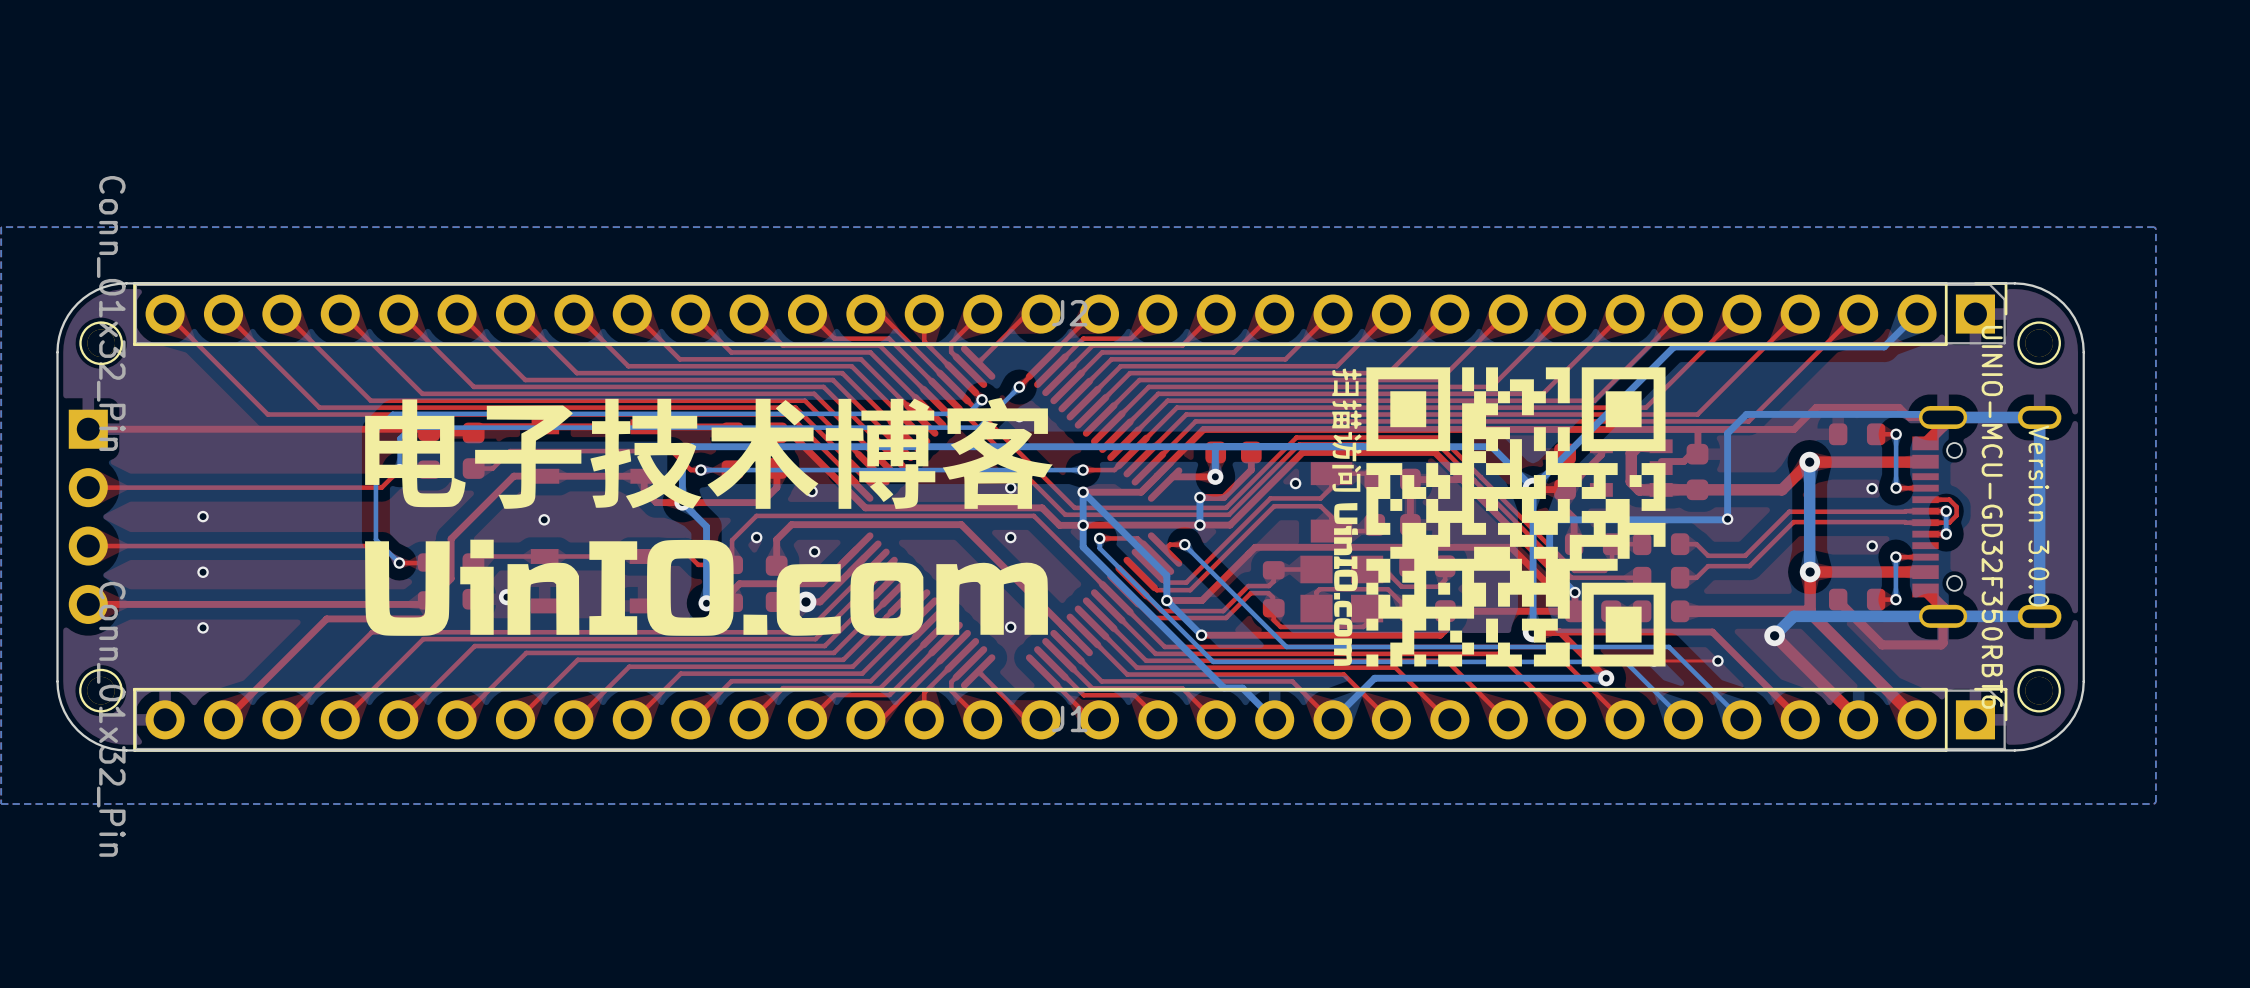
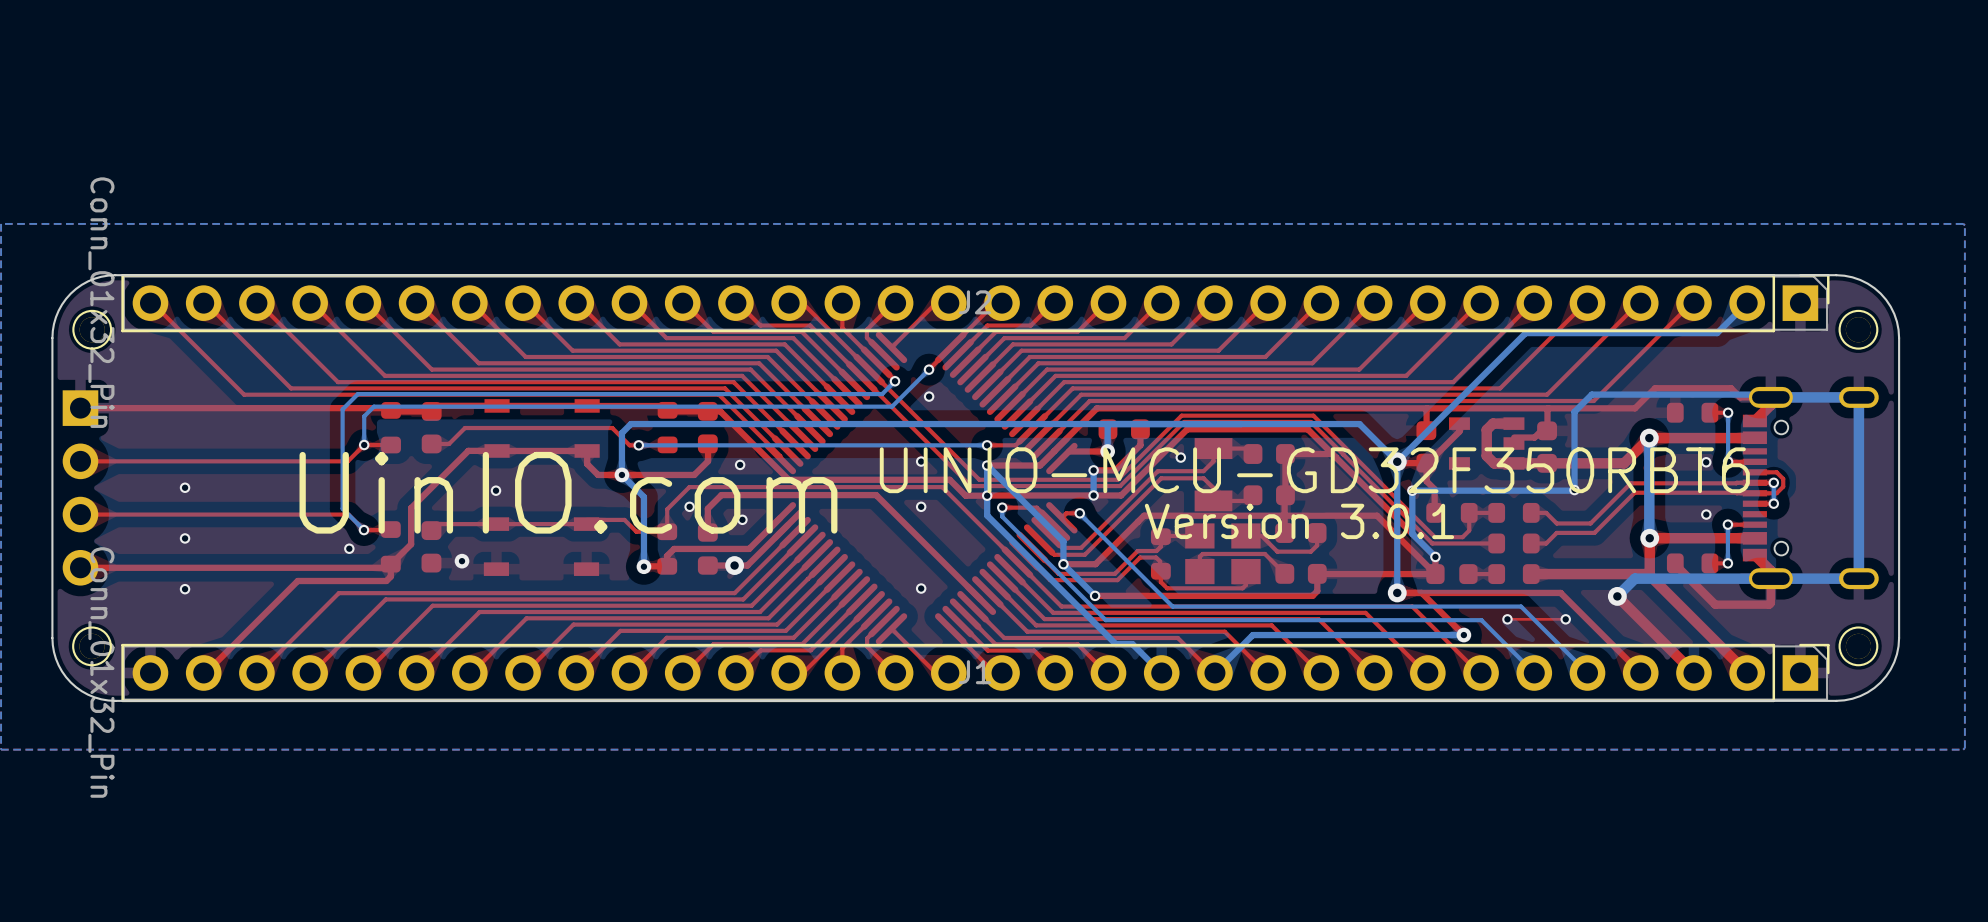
drawing: [1332, 367, 1666, 667] -> none
drawing: [365, 398, 1053, 636] -> none
text: none -> UINIO-MCU-GD32F350RBT6 (1314, 470)
text: Version 3.0.0 (2038, 516) -> none
text: UINIO-MCU-GD32F350RBT6 (1992, 517) -> none
text: none -> UinIO.com (568, 492)
text: none -> Version 3.0.1 (1299, 521)

